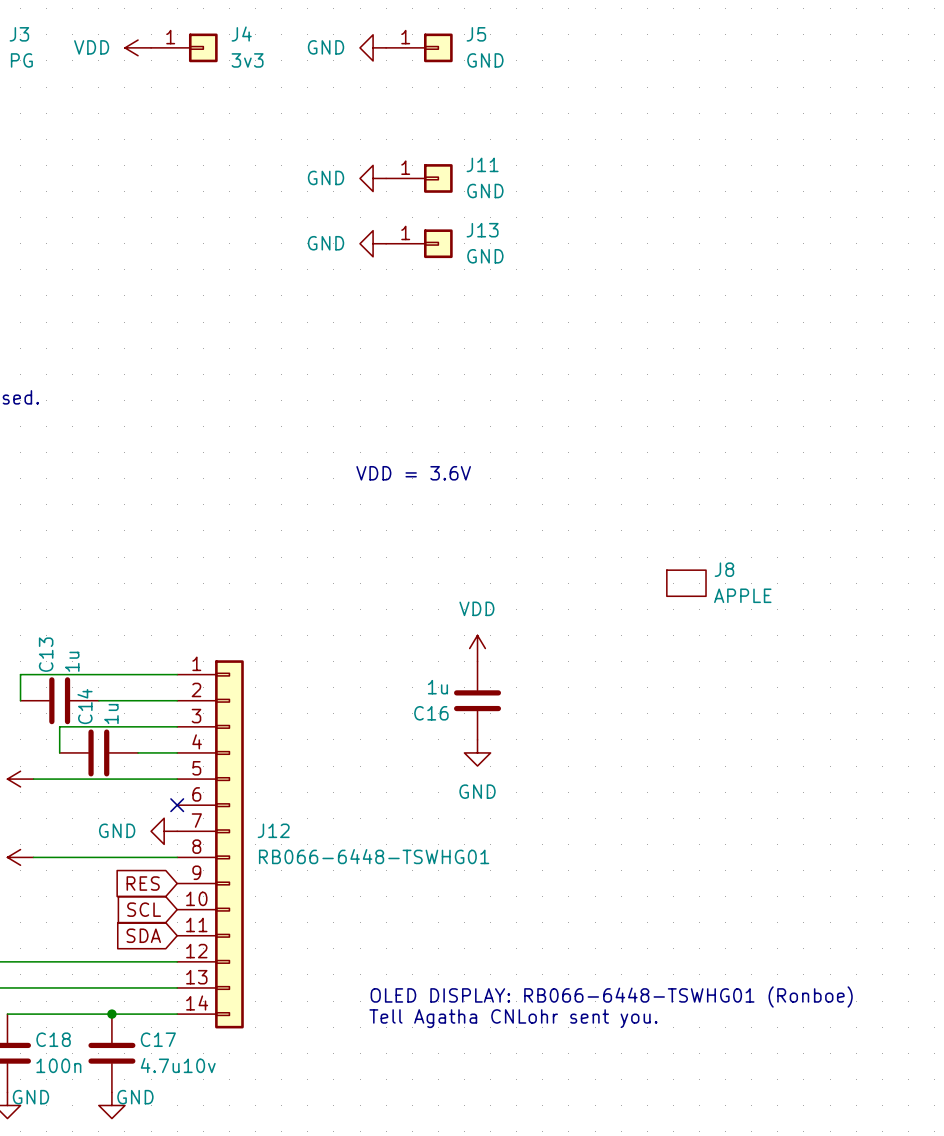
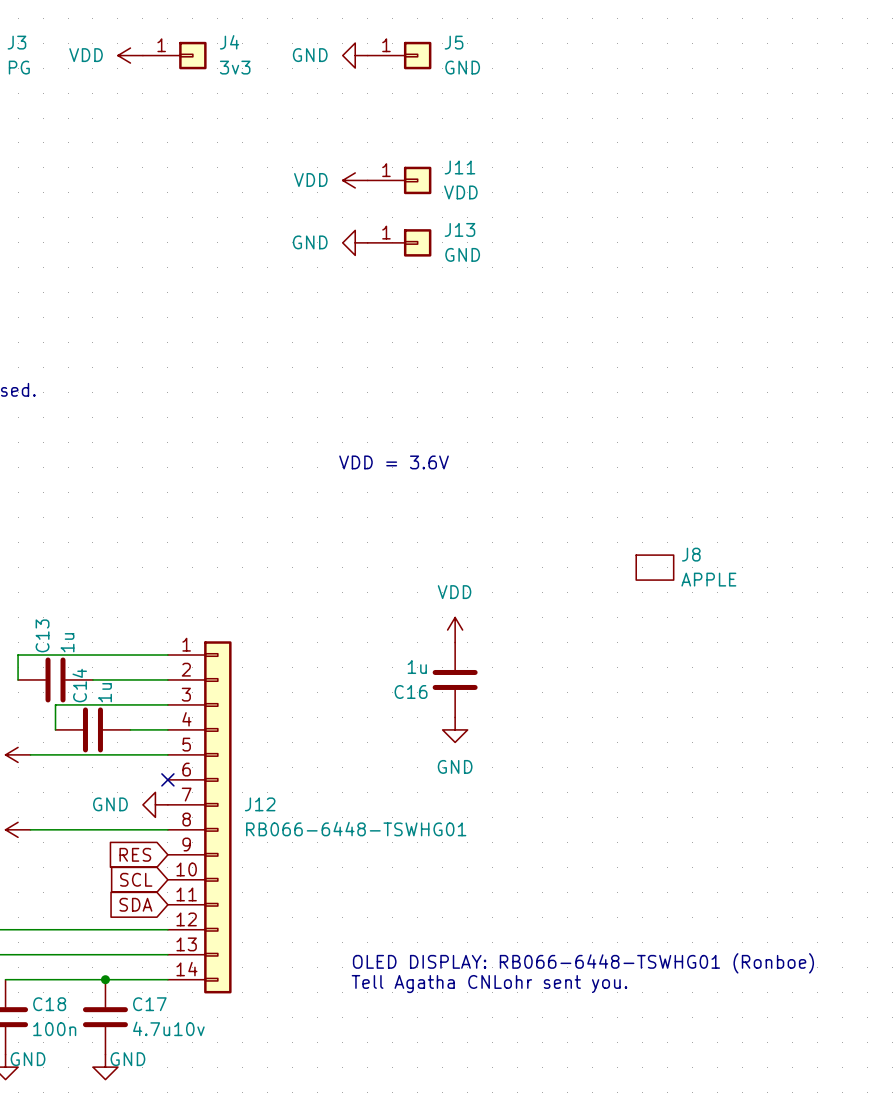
power symbol: GND (373, 178) -> VDD (355, 180)
J11 value: GND (485, 191) -> VDD (460, 192)

